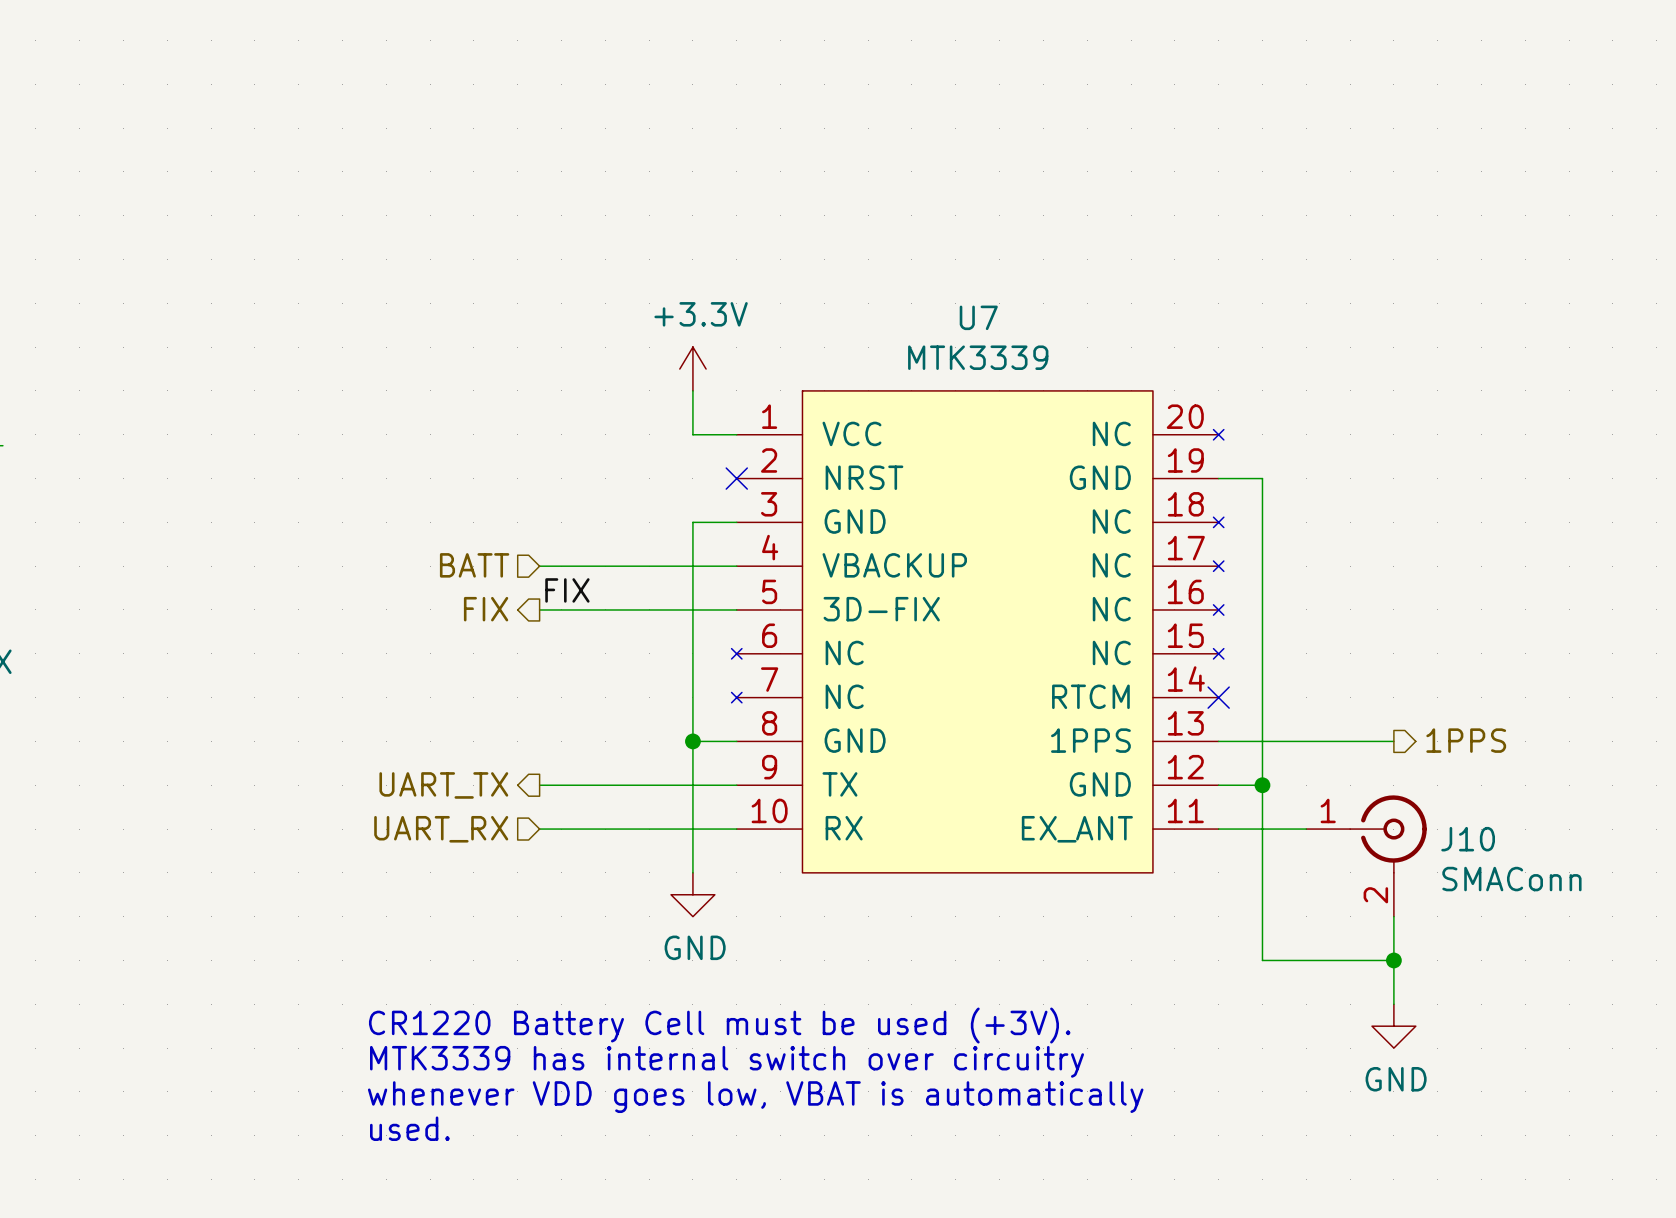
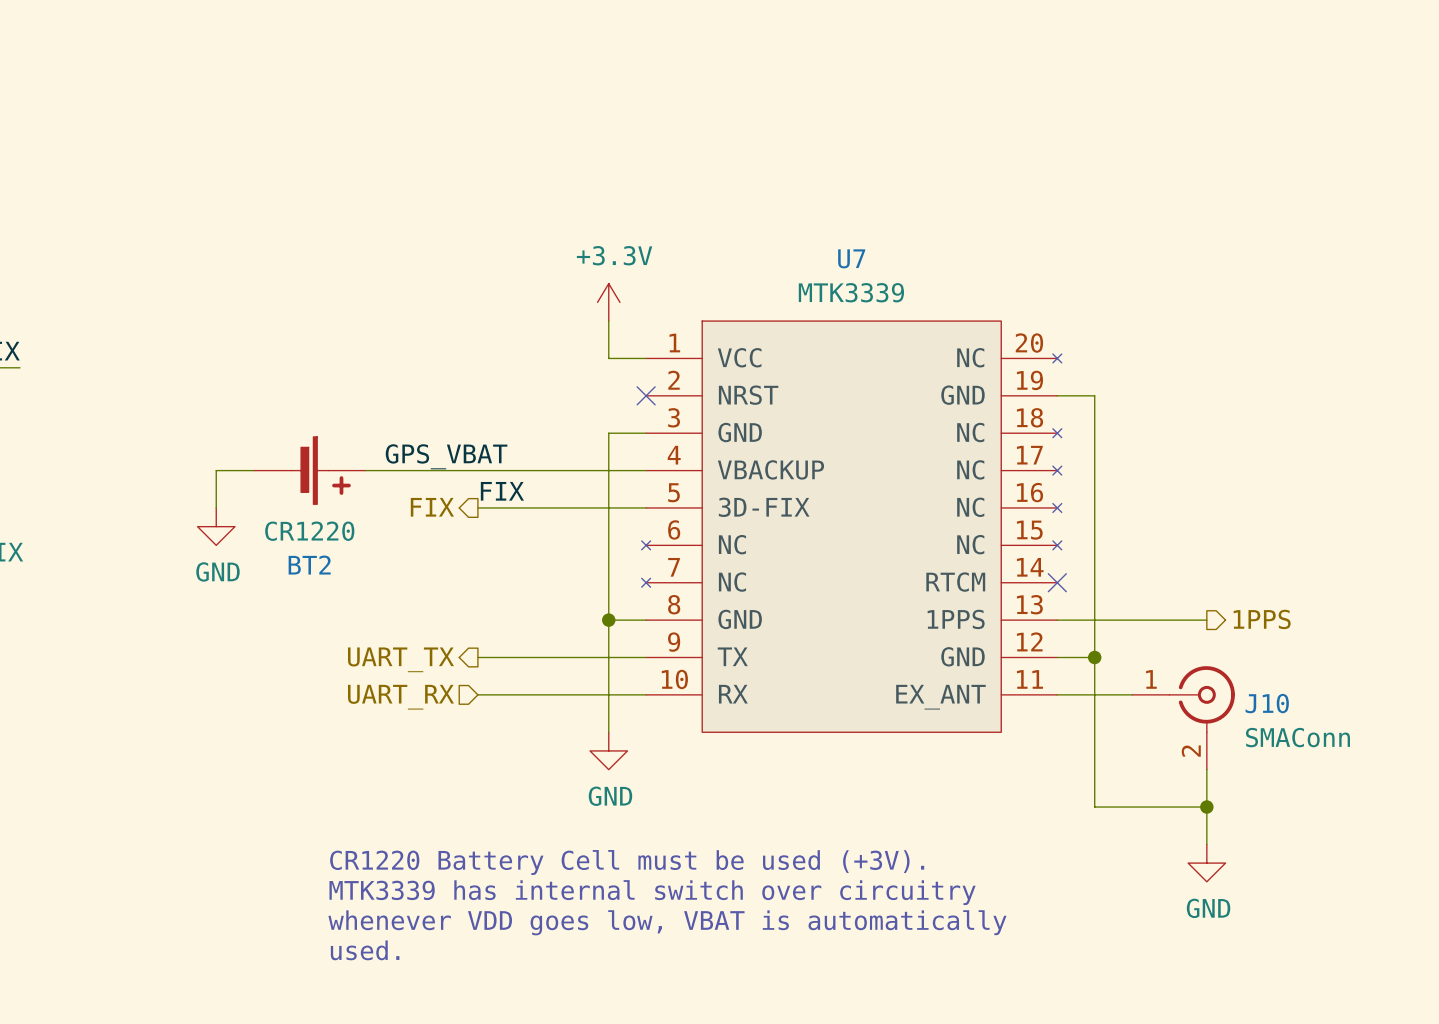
label: none -> GPS_VBAT (446, 456)
hierarchical label: BATT (474, 565) -> none
wire: none -> (253, 470) (216, 470) (216, 507)
BT2: none -> CR1220 (309, 470)
wire: none -> (365, 470) (477, 470)
power symbol: none -> GND (216, 526)

